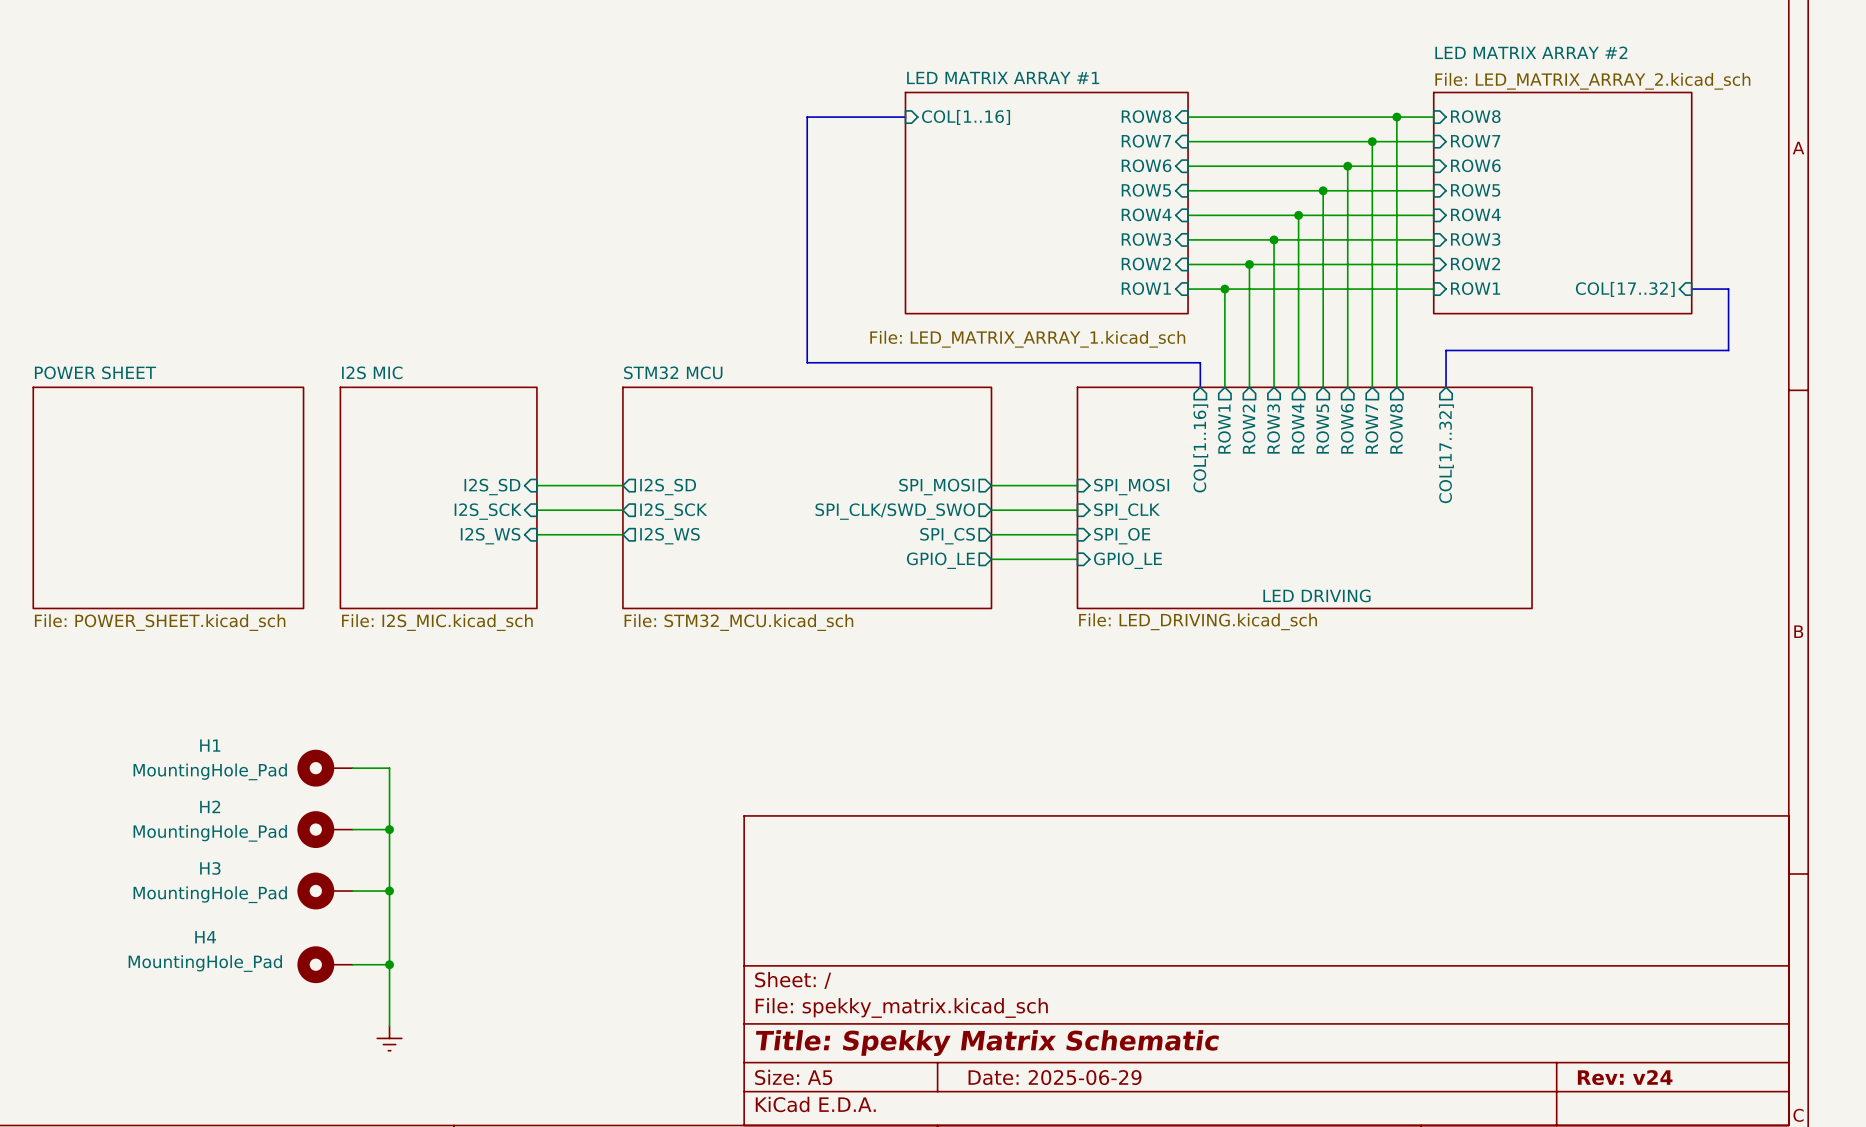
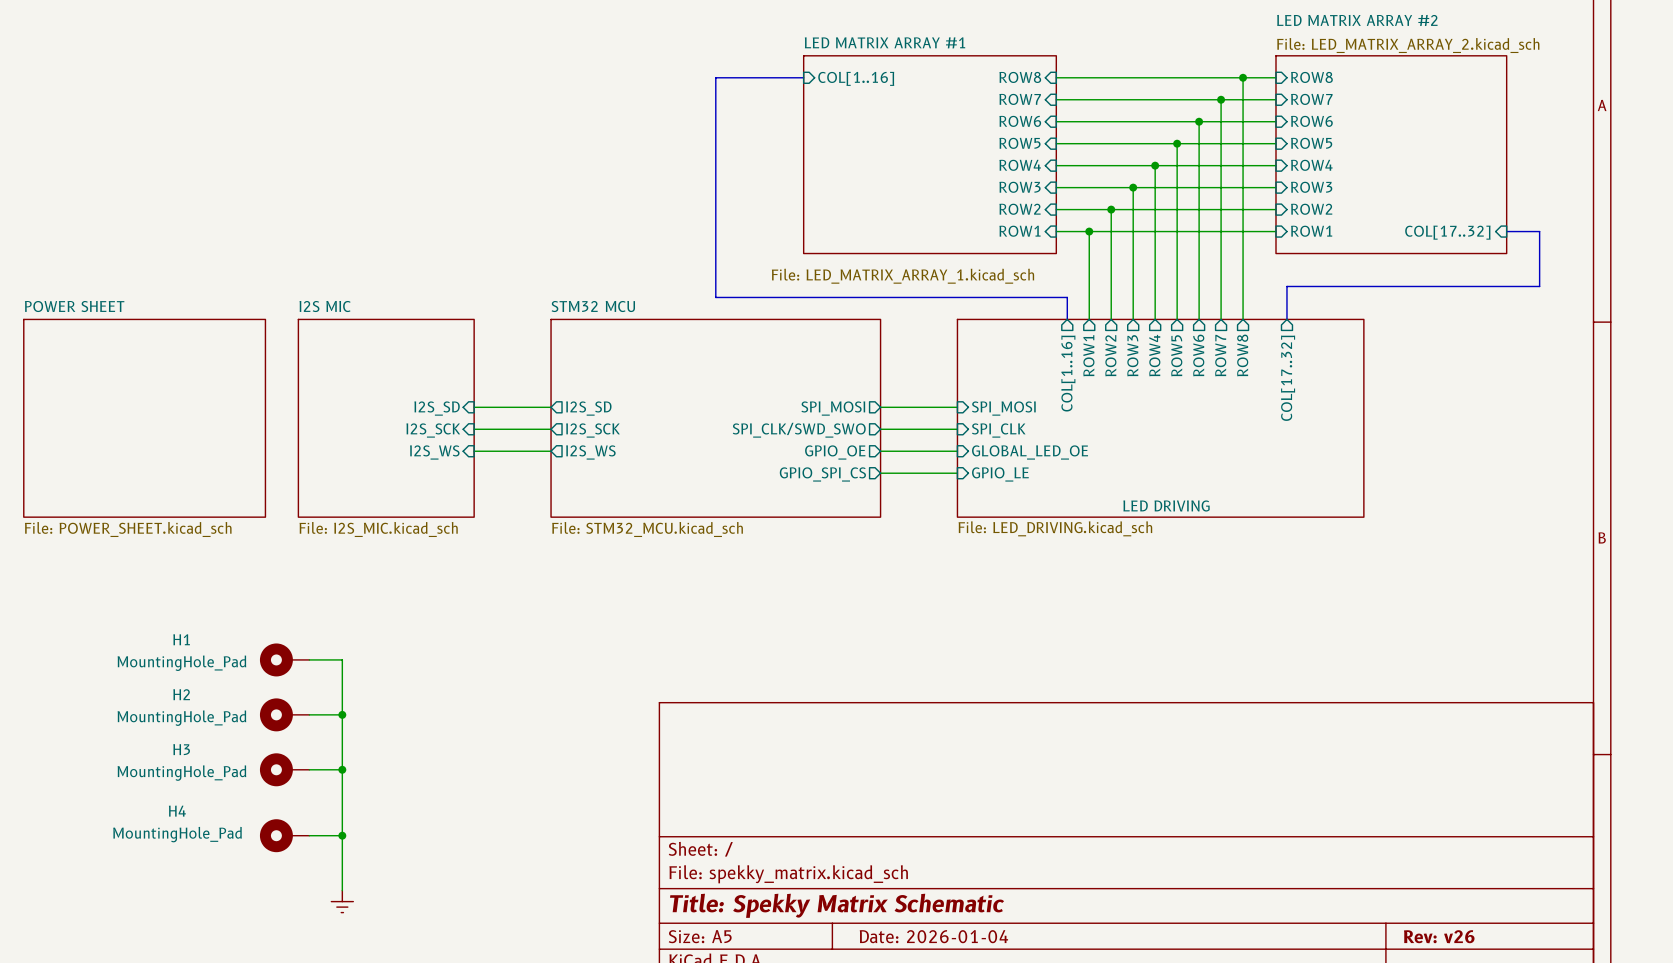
sheet pin: SPI_CS (947, 536) -> GPIO_OE (835, 452)
sheet pin: SPI_OE (1122, 536) -> GLOBAL_LED_OE (1030, 452)
sheet pin: GPIO_LE (940, 560) -> GPIO_SPI_CS (822, 474)
title block: Date: 2025-06-29 (1055, 1077) -> Date: 2026-01-04 (933, 936)
title block: Rev: v24 (1625, 1077) -> Rev: v26 (1439, 936)

